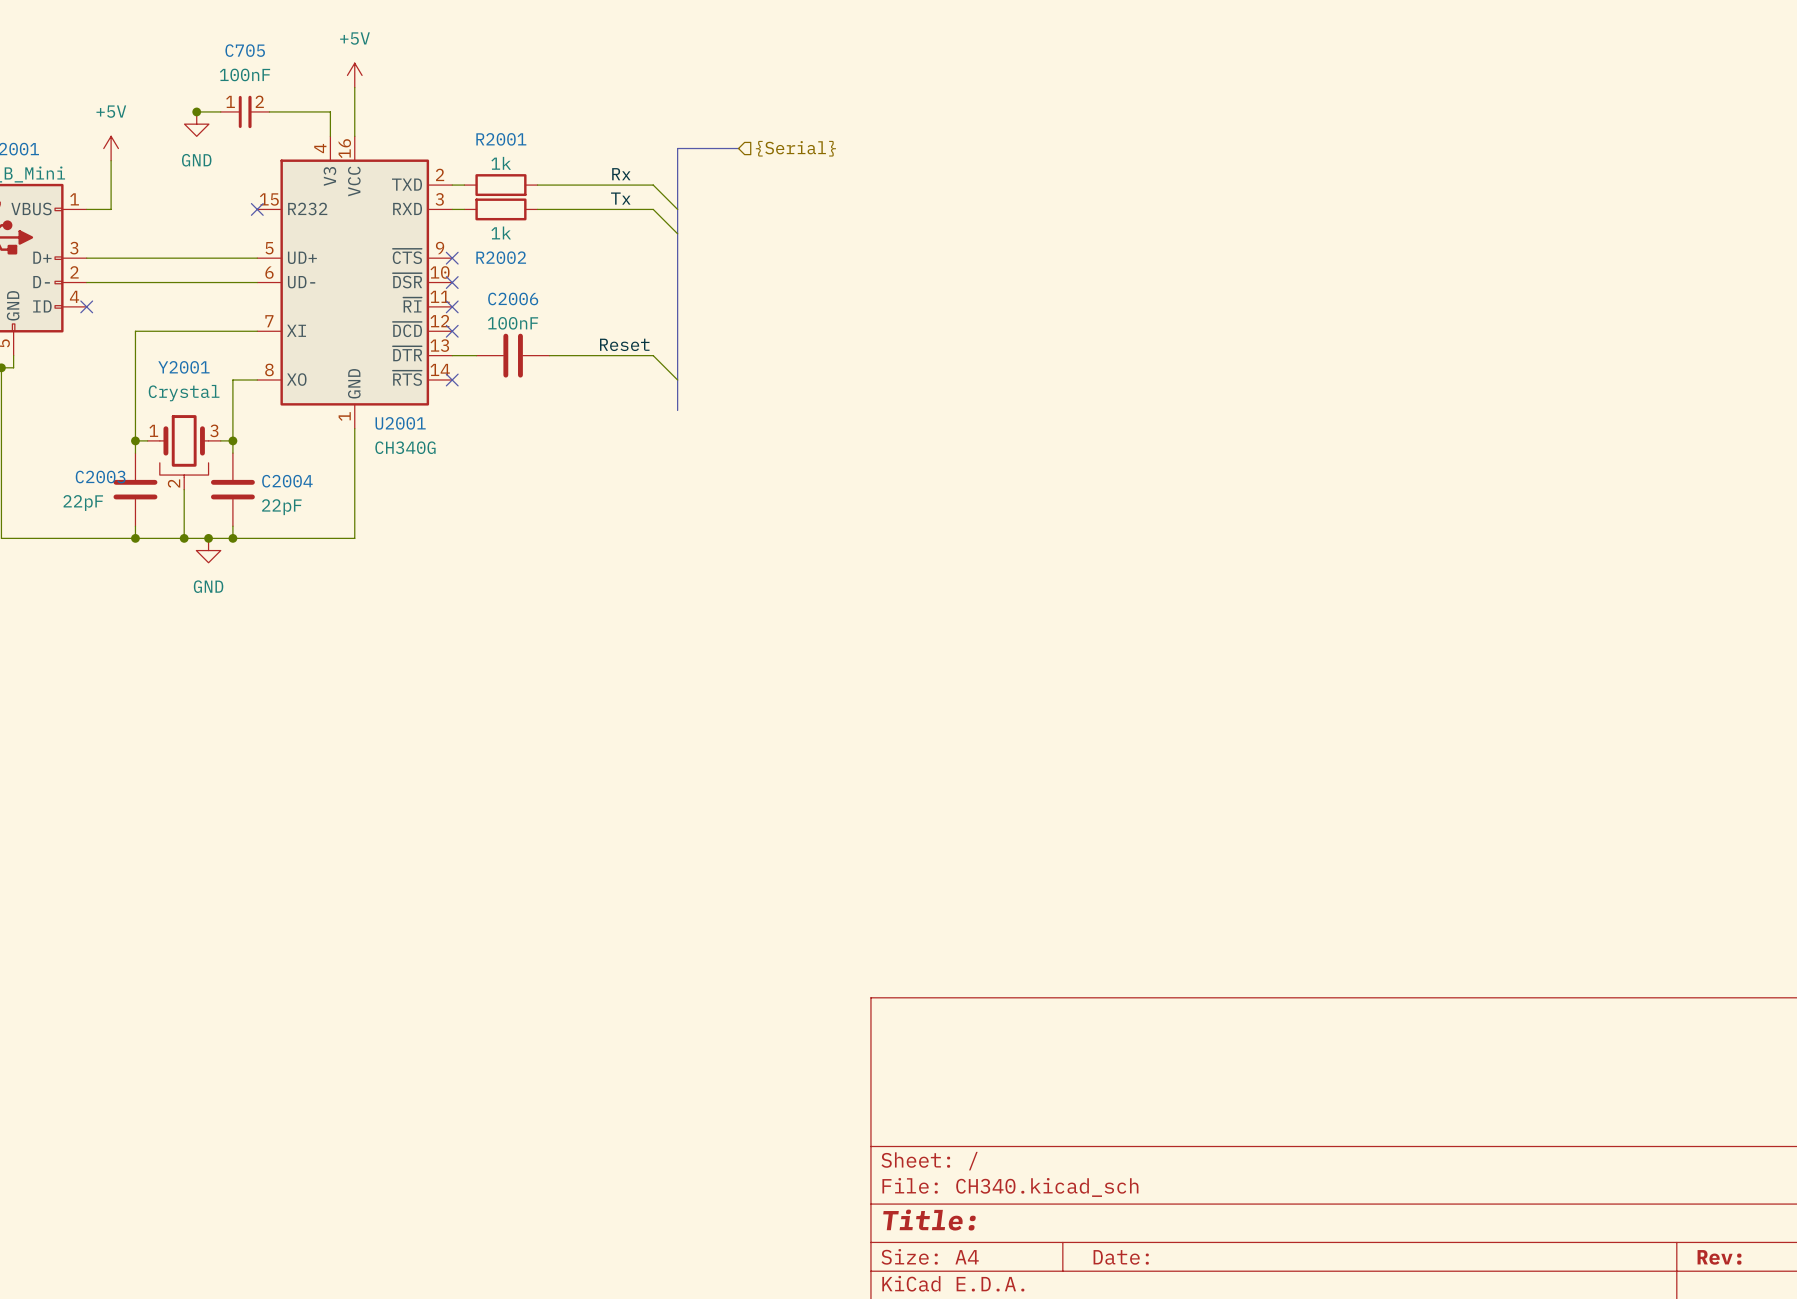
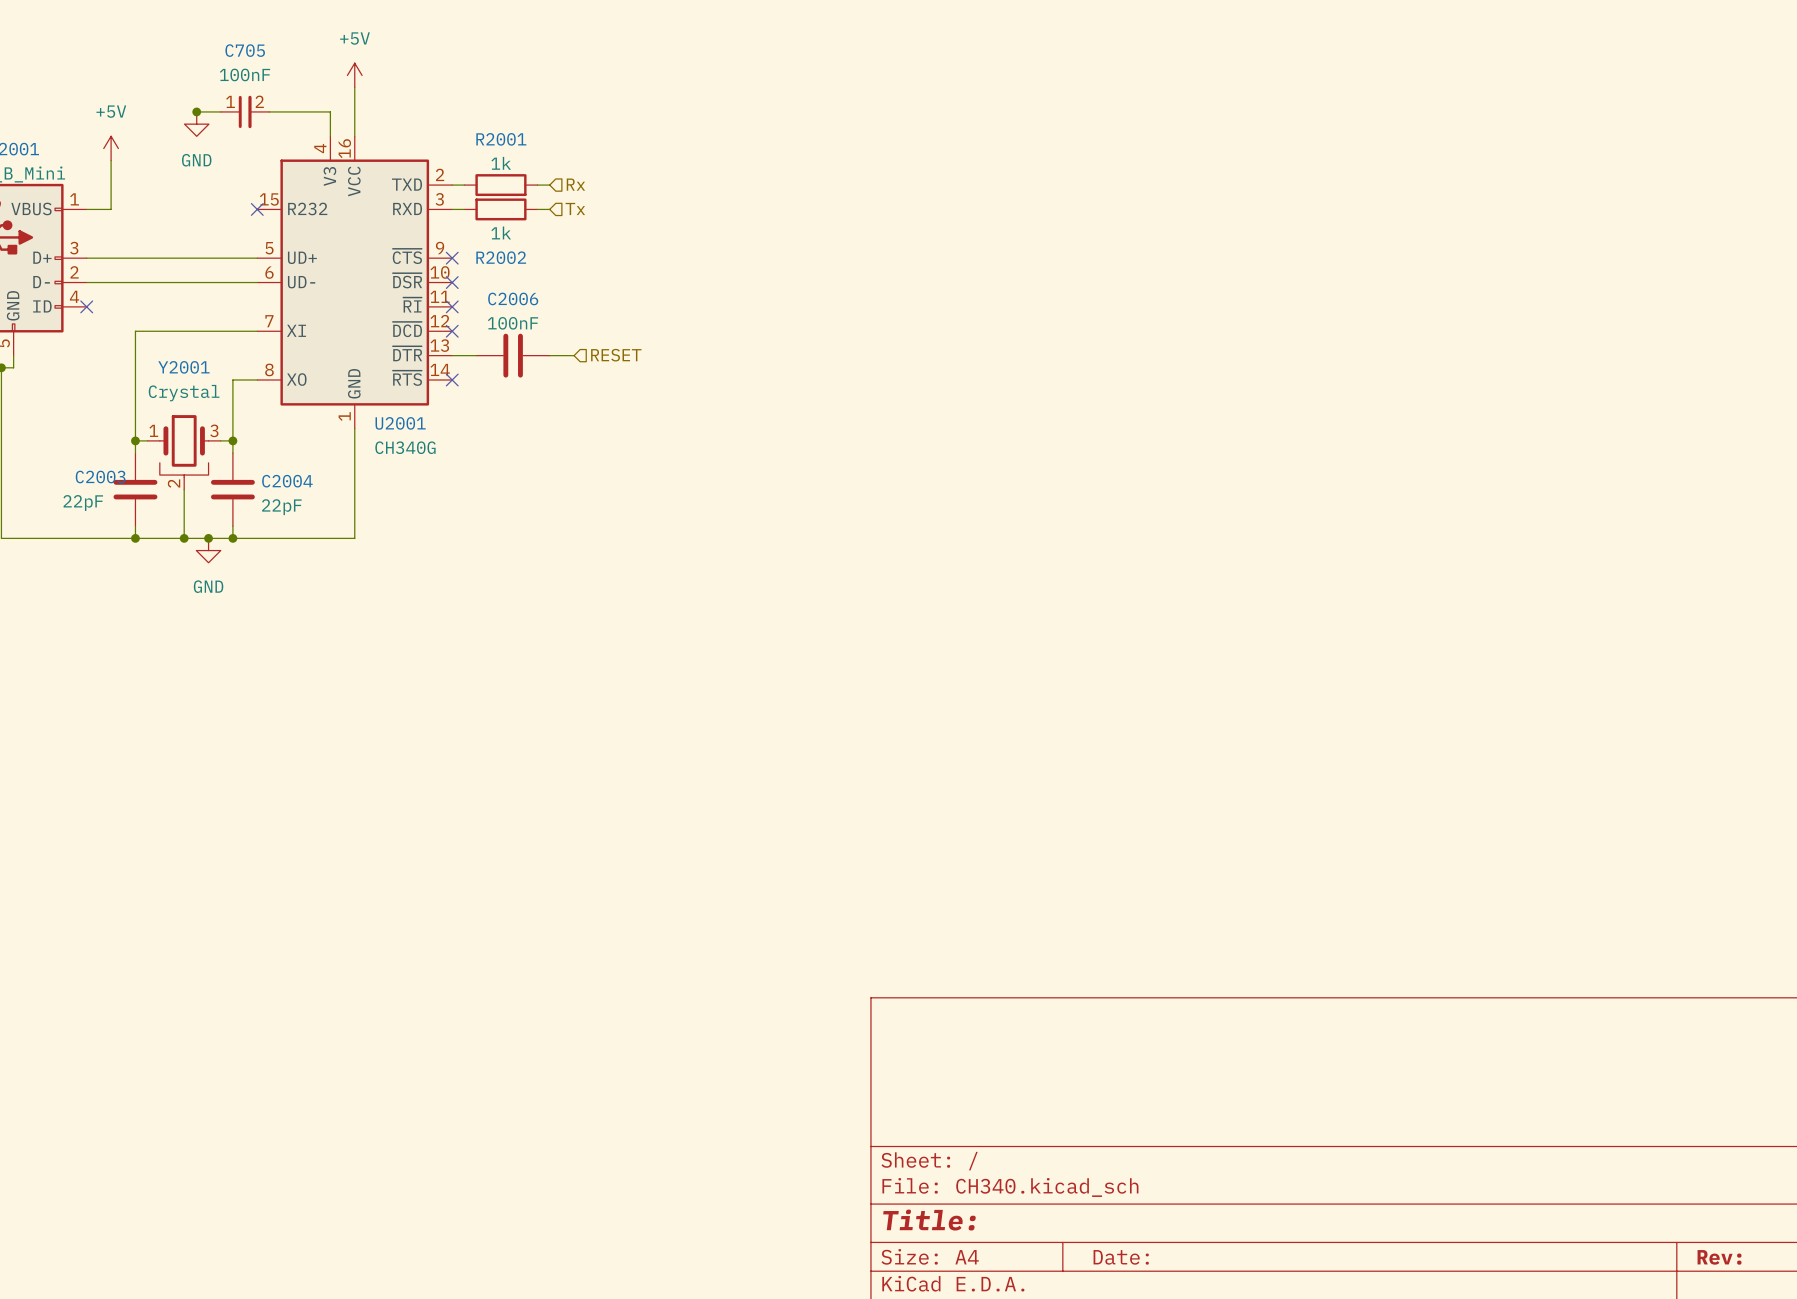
bus: (738, 148) (677, 148) (677, 410) -> none
hierarchical label: {Serial} (795, 148) -> none
label: Rx (621, 174) -> none
hierarchical label: none -> Rx (575, 184)
wire: (549, 185) (653, 185) (677, 209) -> none
label: Tx (620, 198) -> none
hierarchical label: none -> Tx (575, 208)
wire: (549, 209) (653, 209) (677, 233) -> none
label: Reset (624, 344) -> none
wire: (574, 355) (653, 355) (677, 380) -> none
hierarchical label: none -> RESET (616, 355)

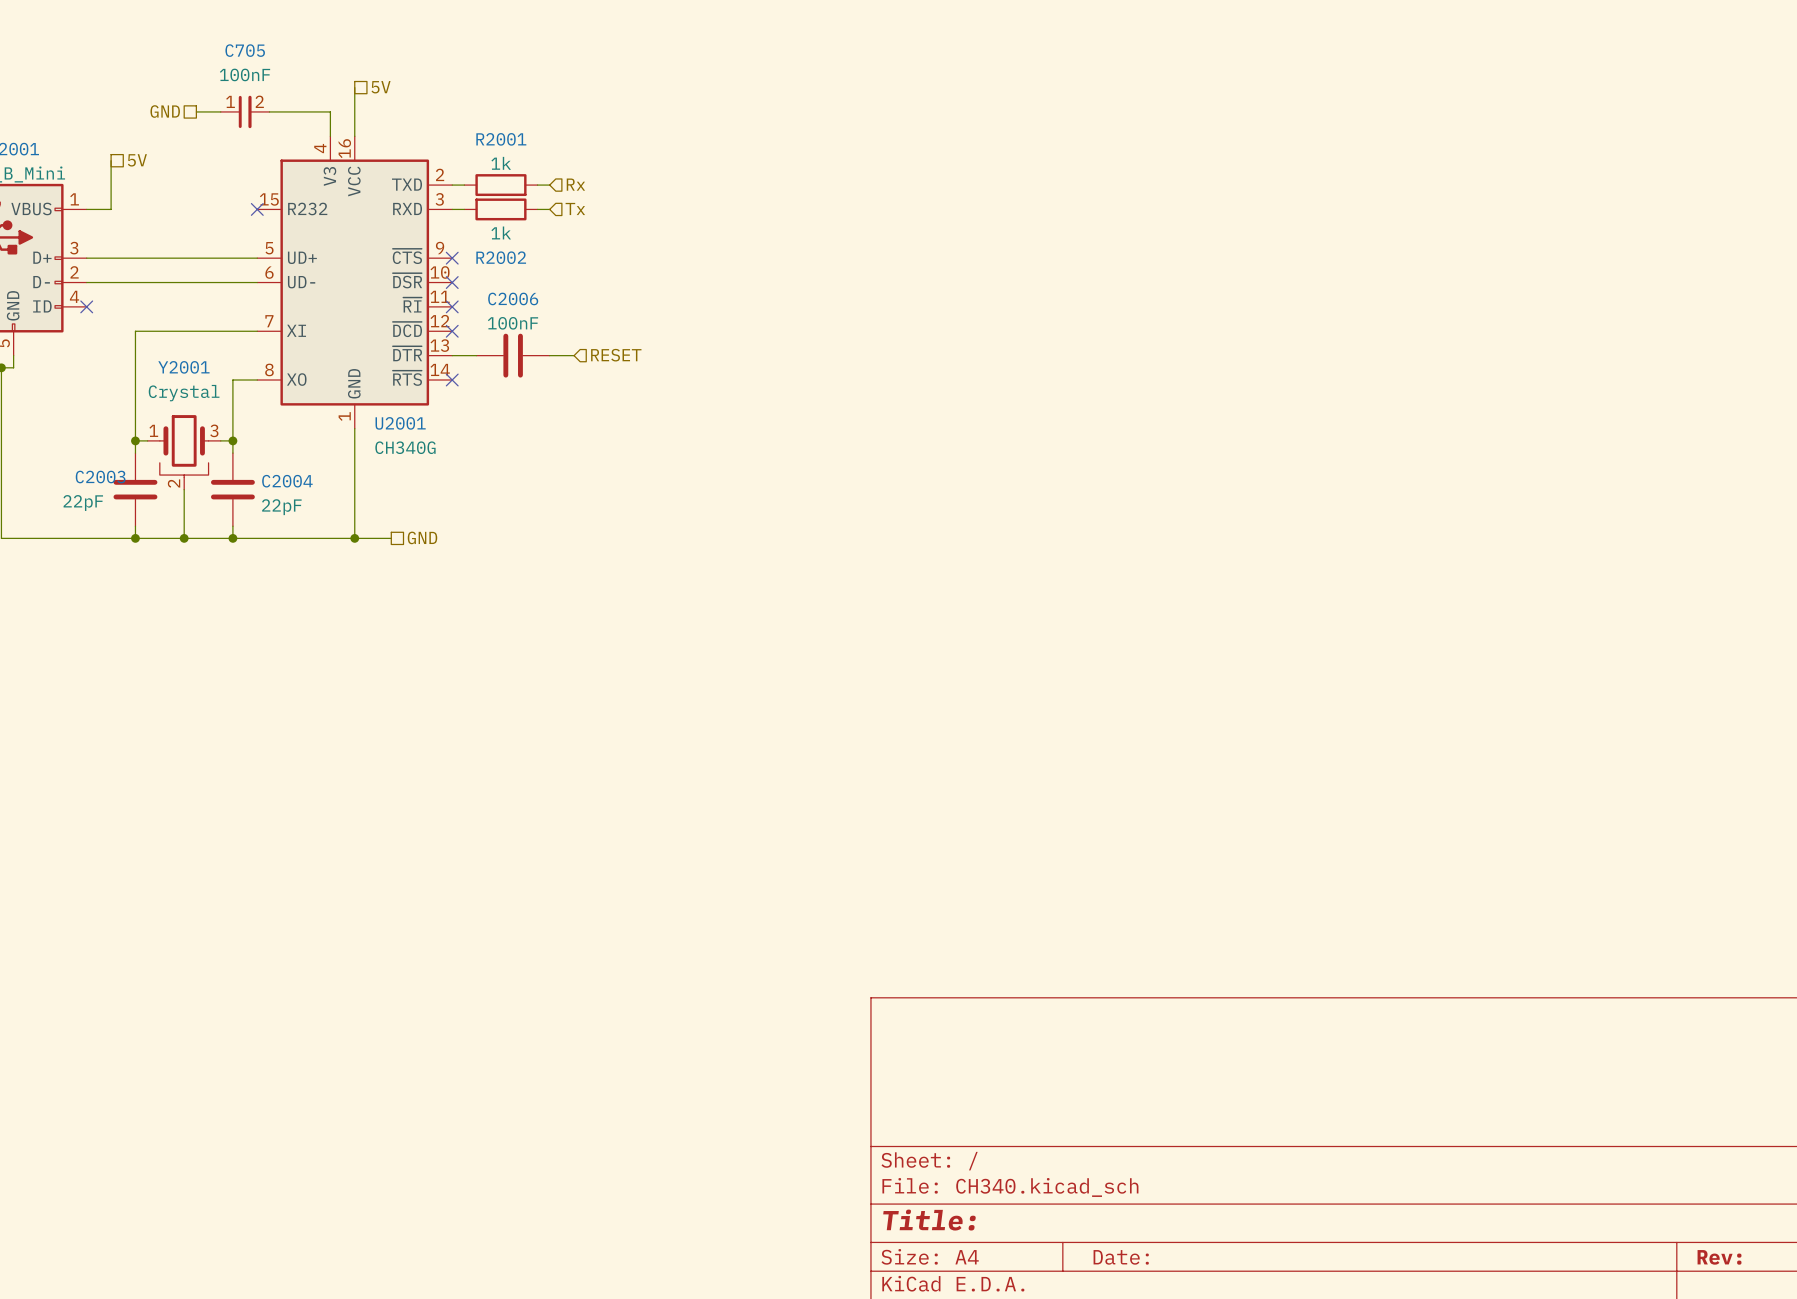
power symbol: +5V (354, 75) -> none
hierarchical label: none -> 5V (381, 87)
hierarchical label: none -> GND (165, 111)
junction: (196, 111) -> none
power symbol: GND (196, 124) -> none
power symbol: +5V (111, 148) -> none
hierarchical label: none -> 5V (137, 160)
hierarchical label: none -> GND (422, 537)
junction: (208, 538) -> none
wire: none -> (354, 538) (391, 538)
junction: none -> (354, 538)
power symbol: GND (208, 550) -> none

